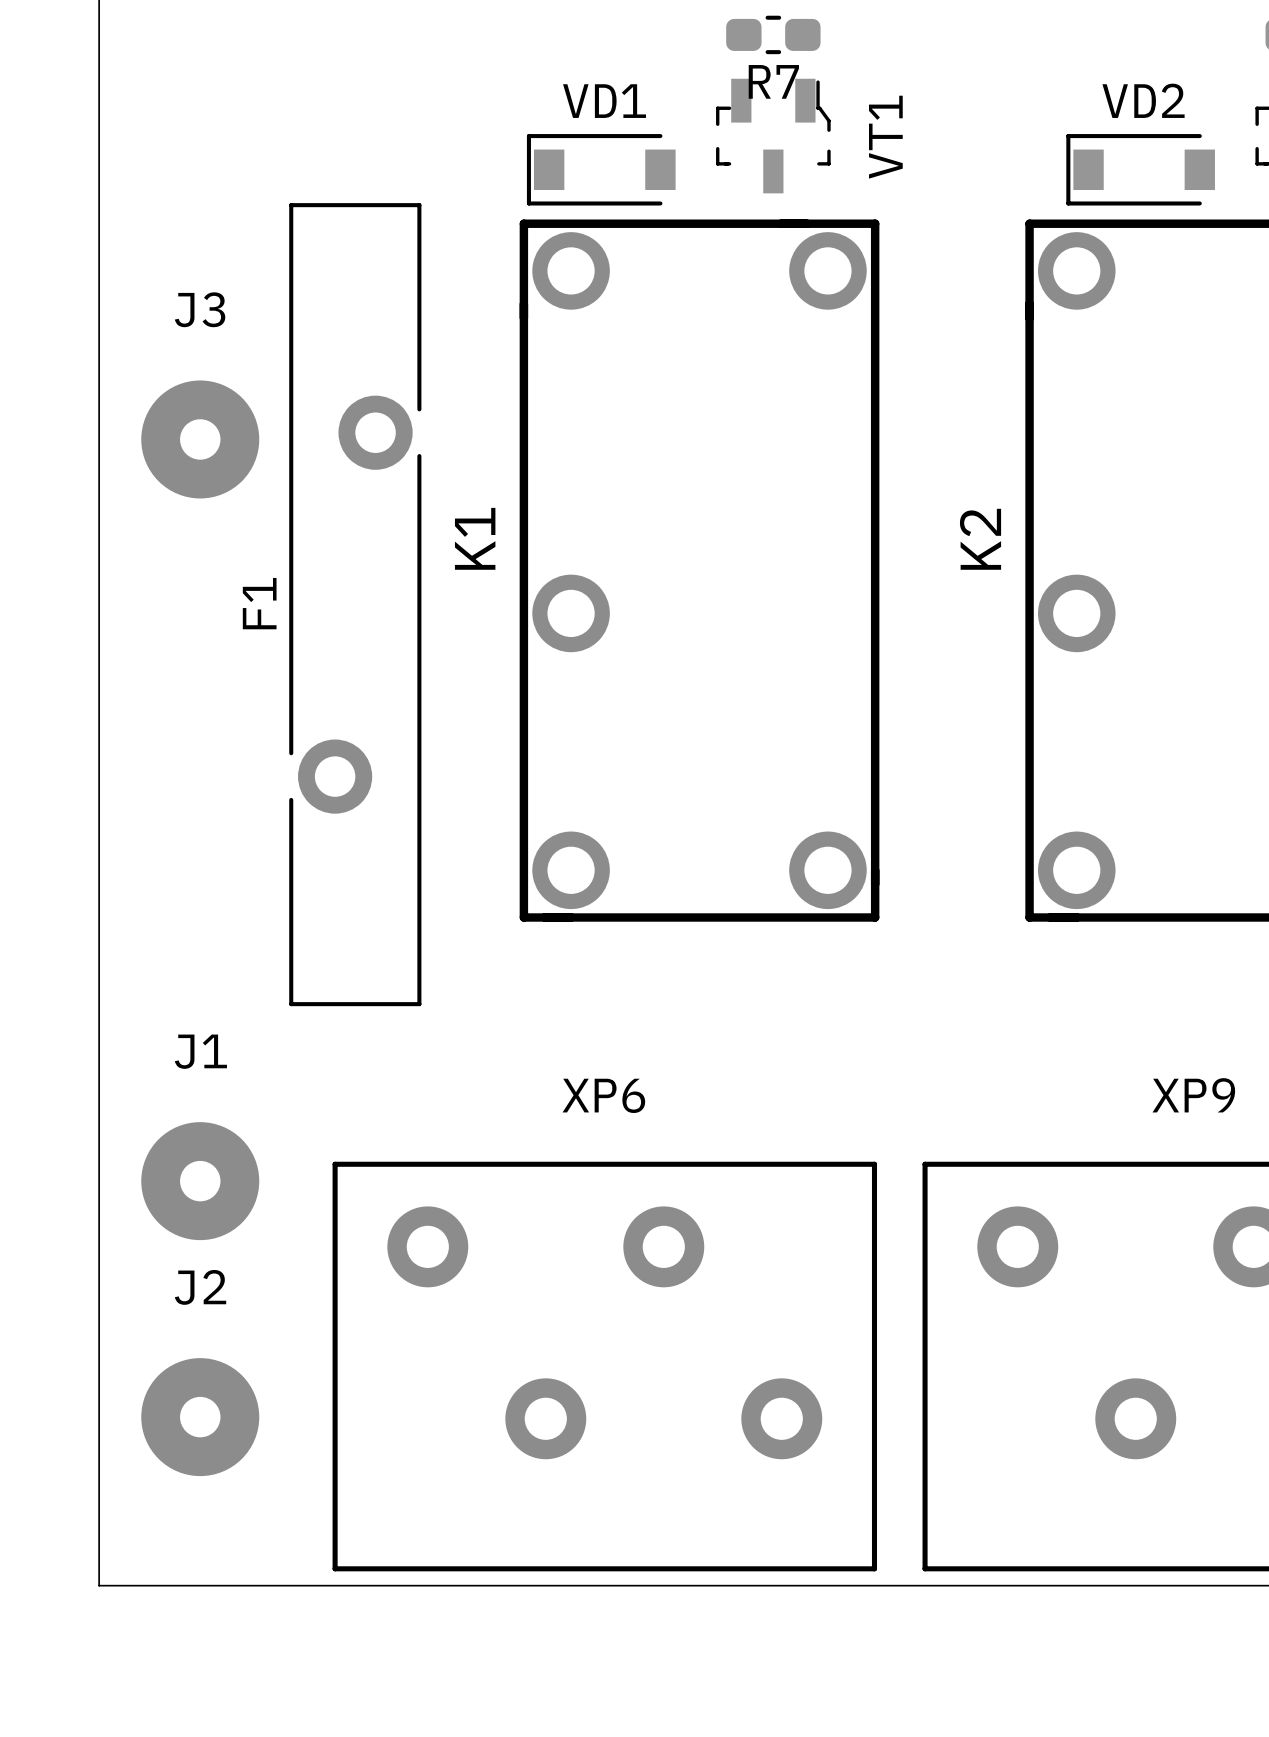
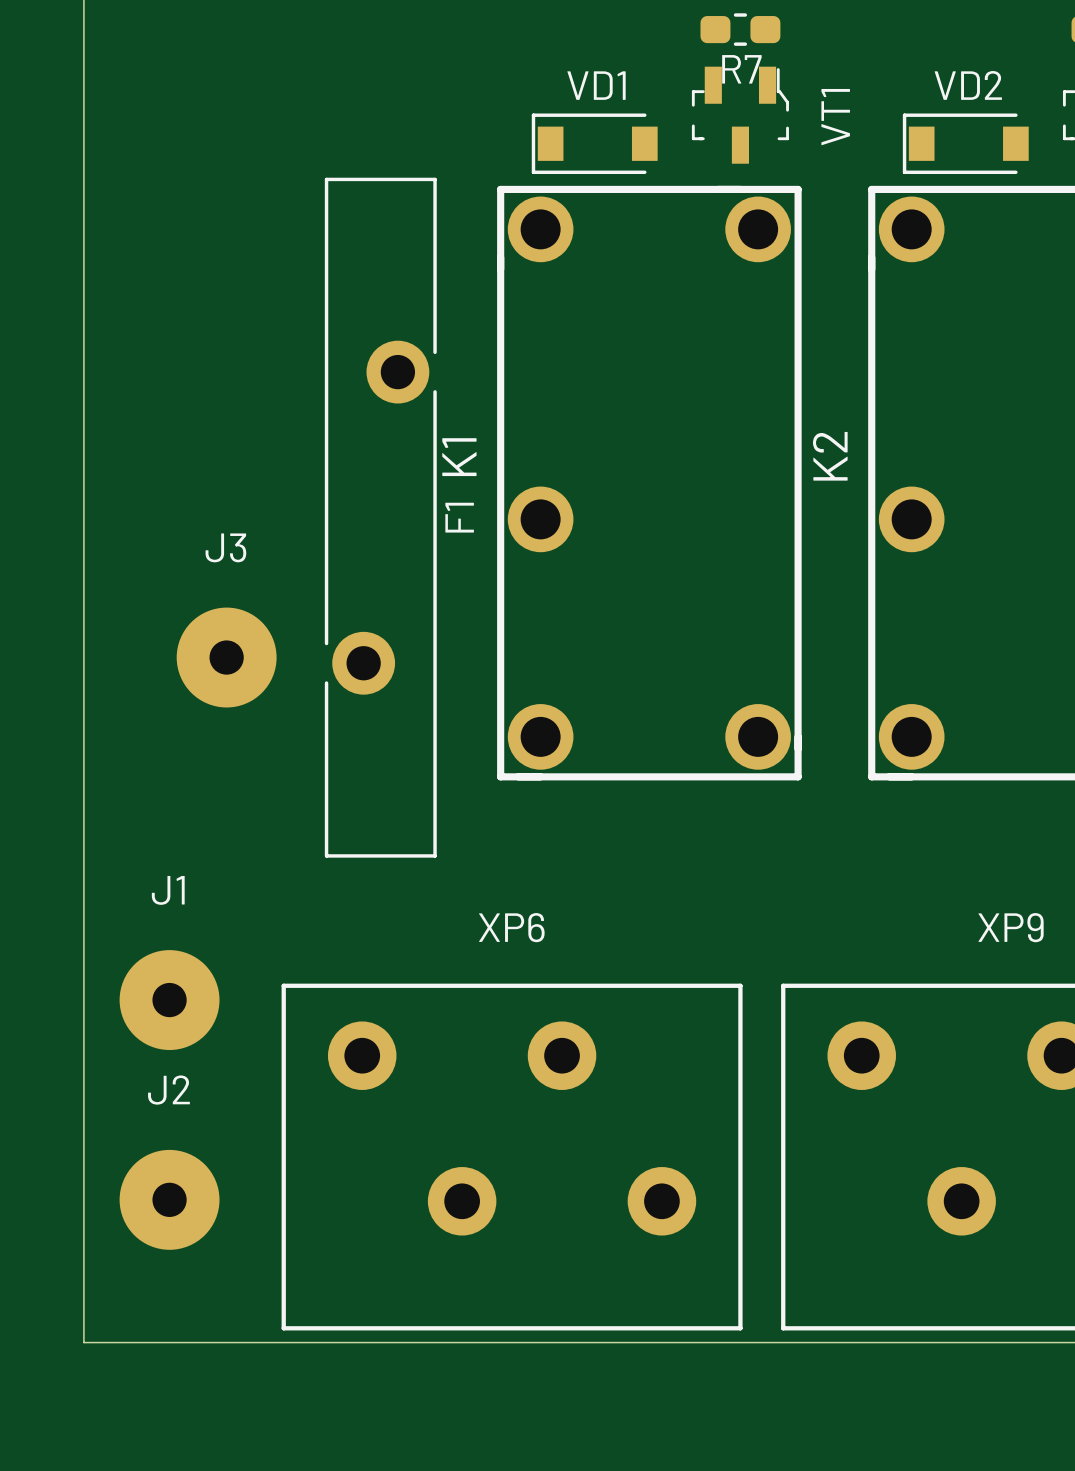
R7 position: (773, 34) -> (740, 29)
VT1 position: (773, 136) -> (740, 115)
VD1 position: (601, 169) -> (594, 143)
J3 position: (200, 439) -> (226, 657)
K1 position: (699, 570) -> (649, 483)
F1 name position: F1 (259, 603) -> F1 (459, 517)
F1 position: (355, 604) -> (380, 517)

